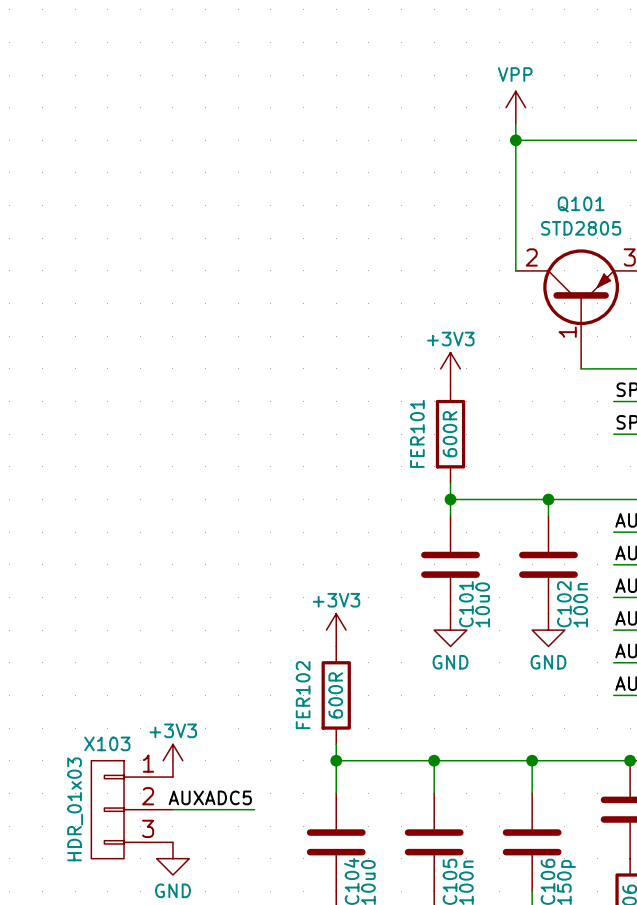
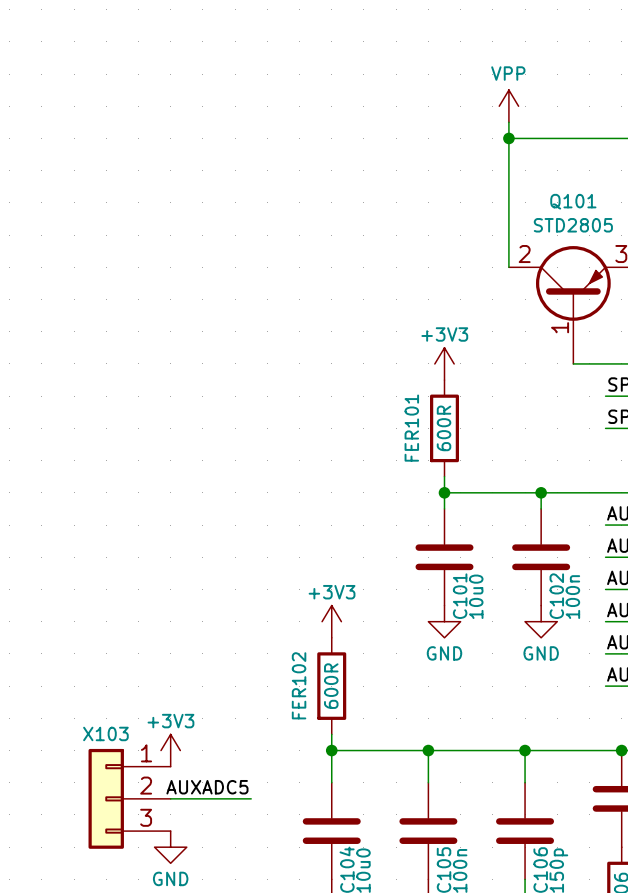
X103 symbol: [91, 760, 173, 859] -> [88, 748, 171, 849]
X103 value: HDR_01x03 (75, 809) -> none

